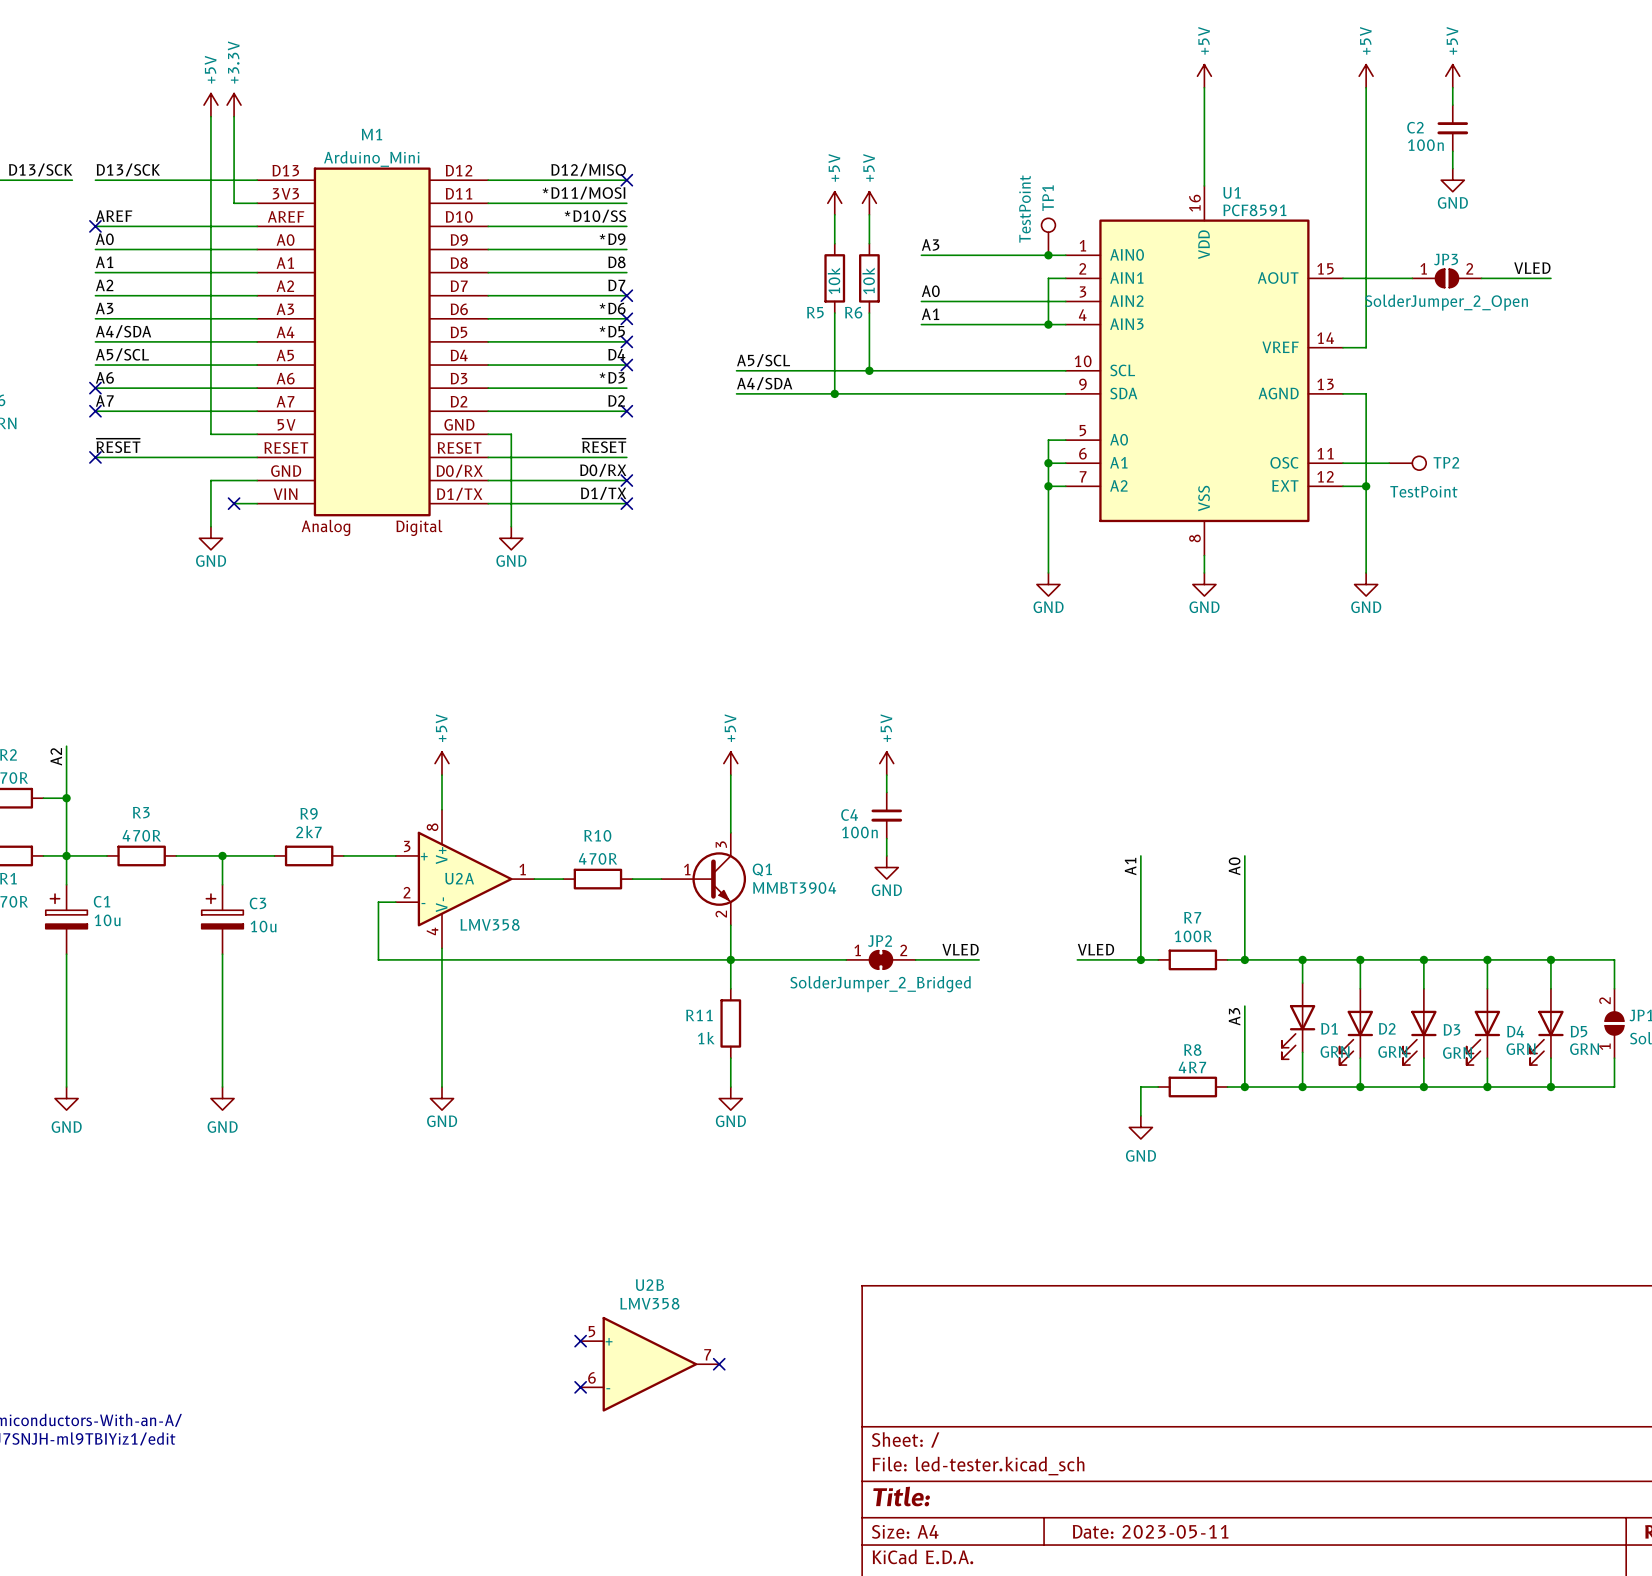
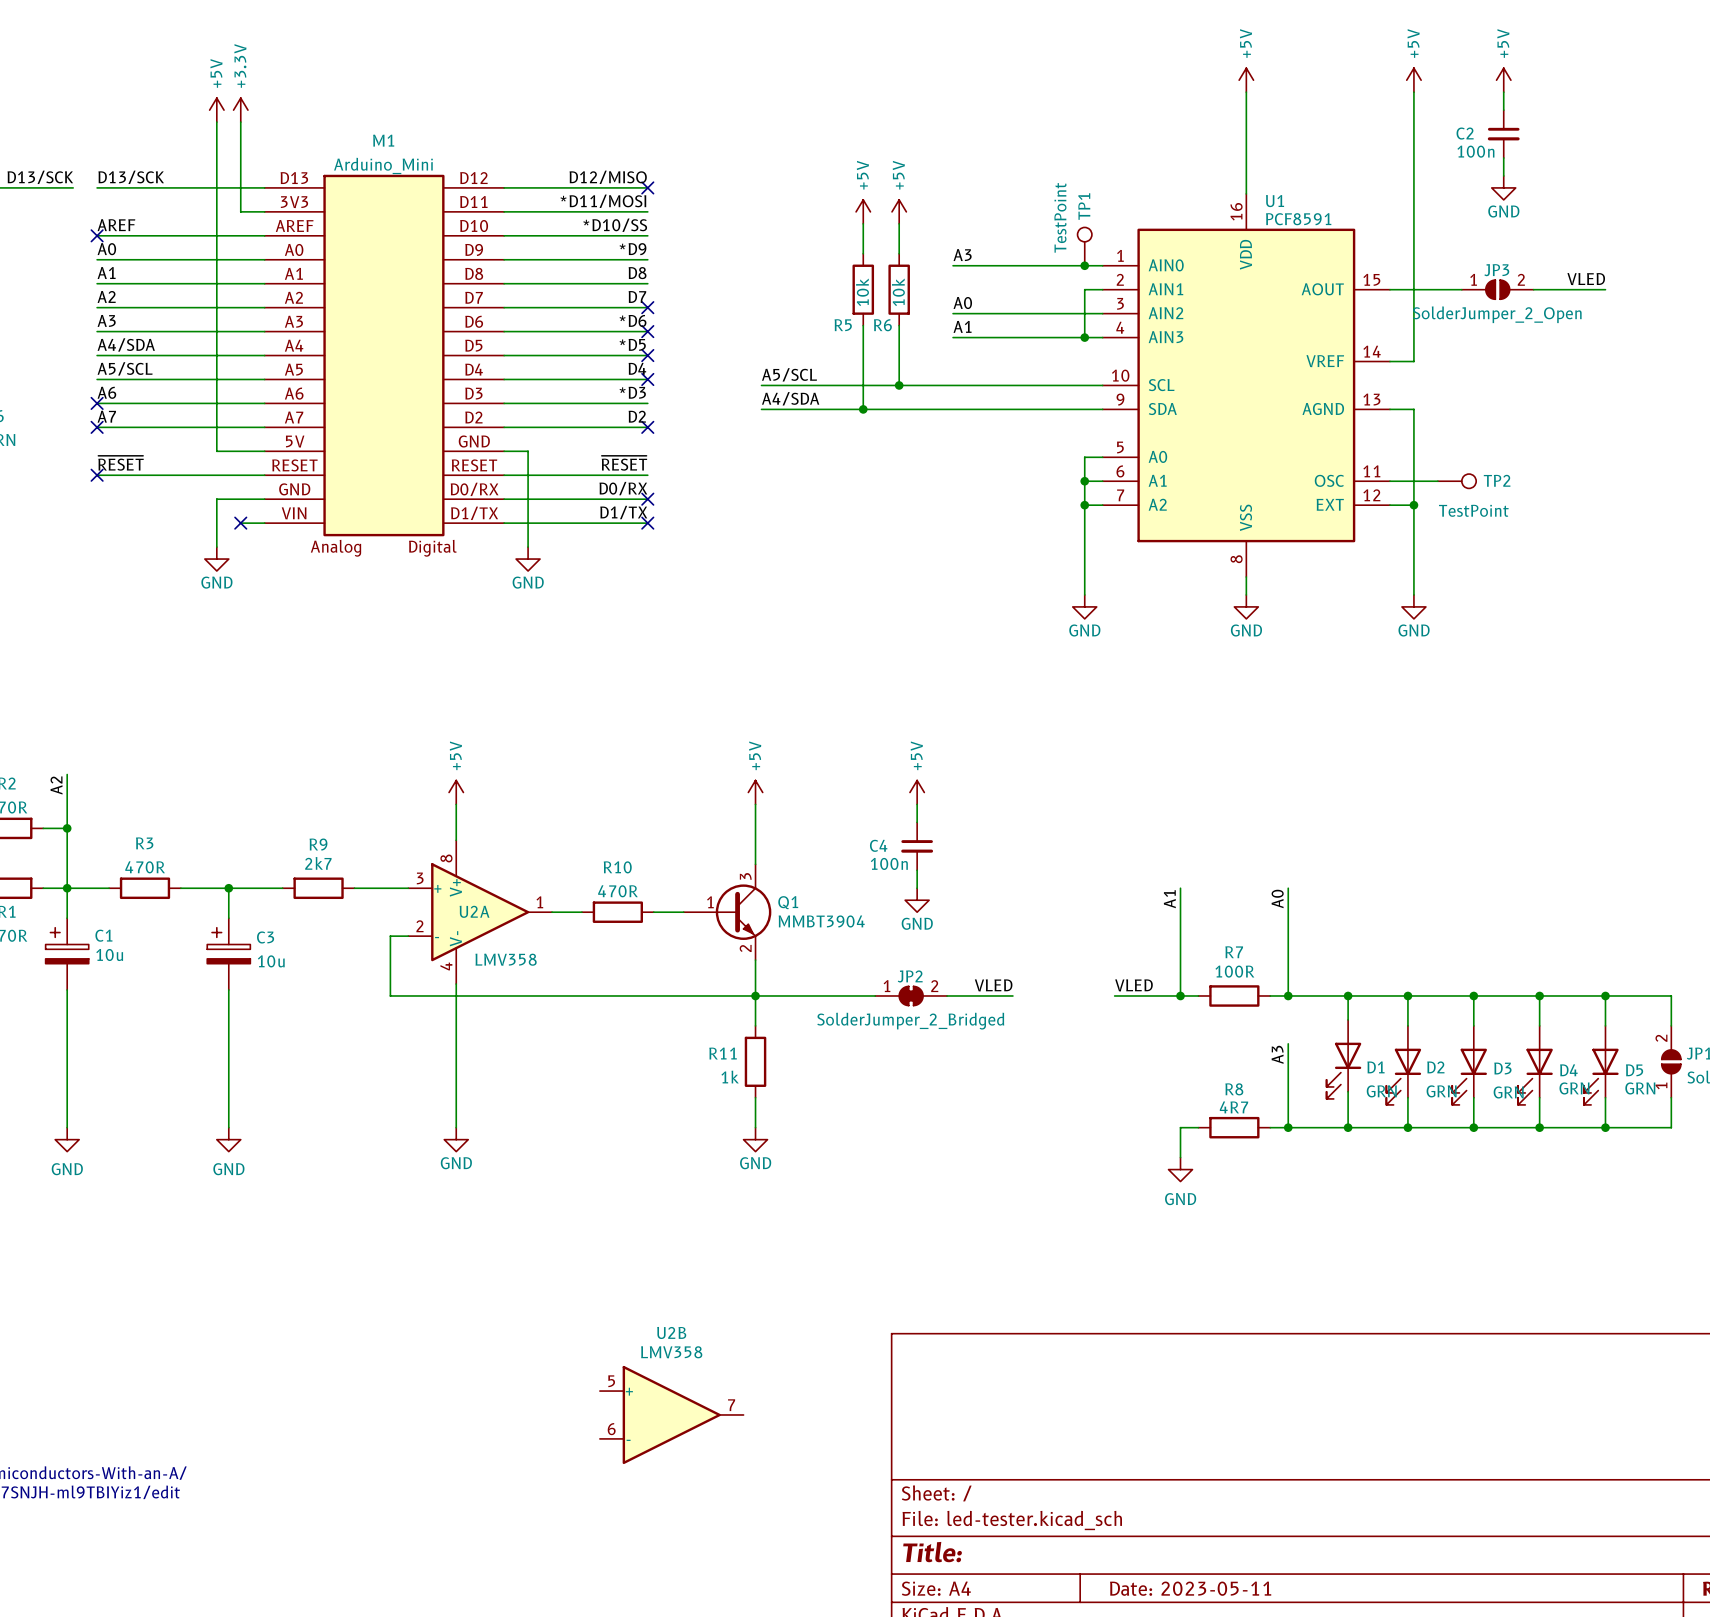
no-connect mark: (580, 1341) -> none
no-connect mark: (719, 1364) -> none
no-connect mark: (580, 1387) -> none

